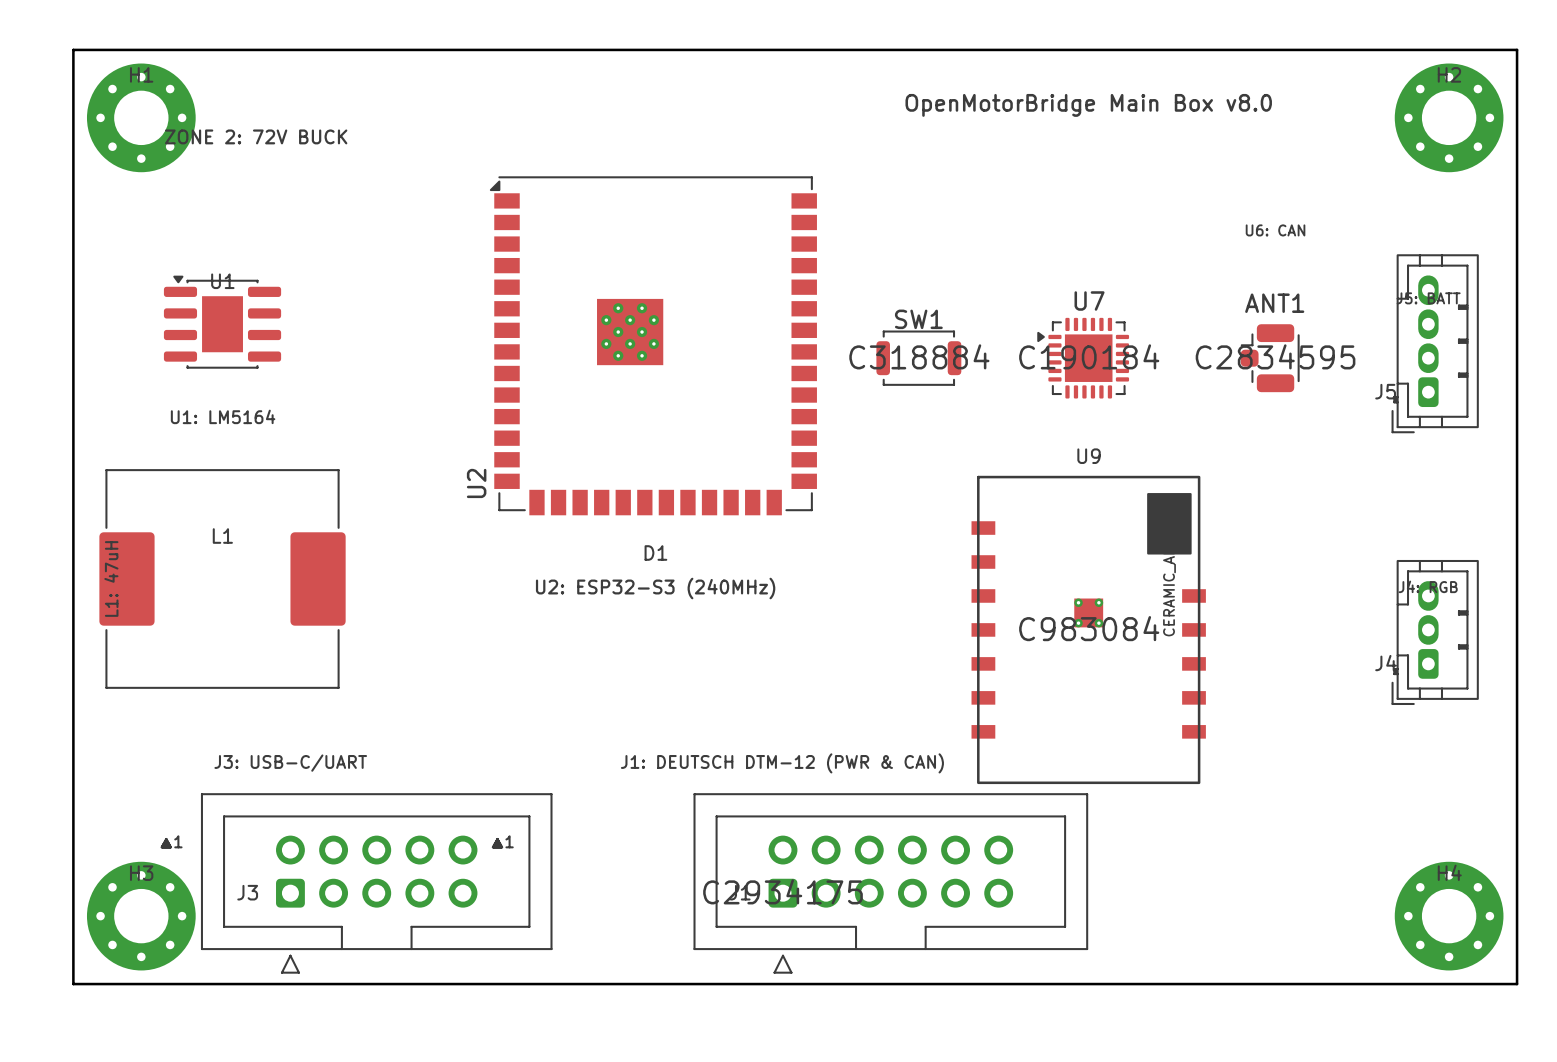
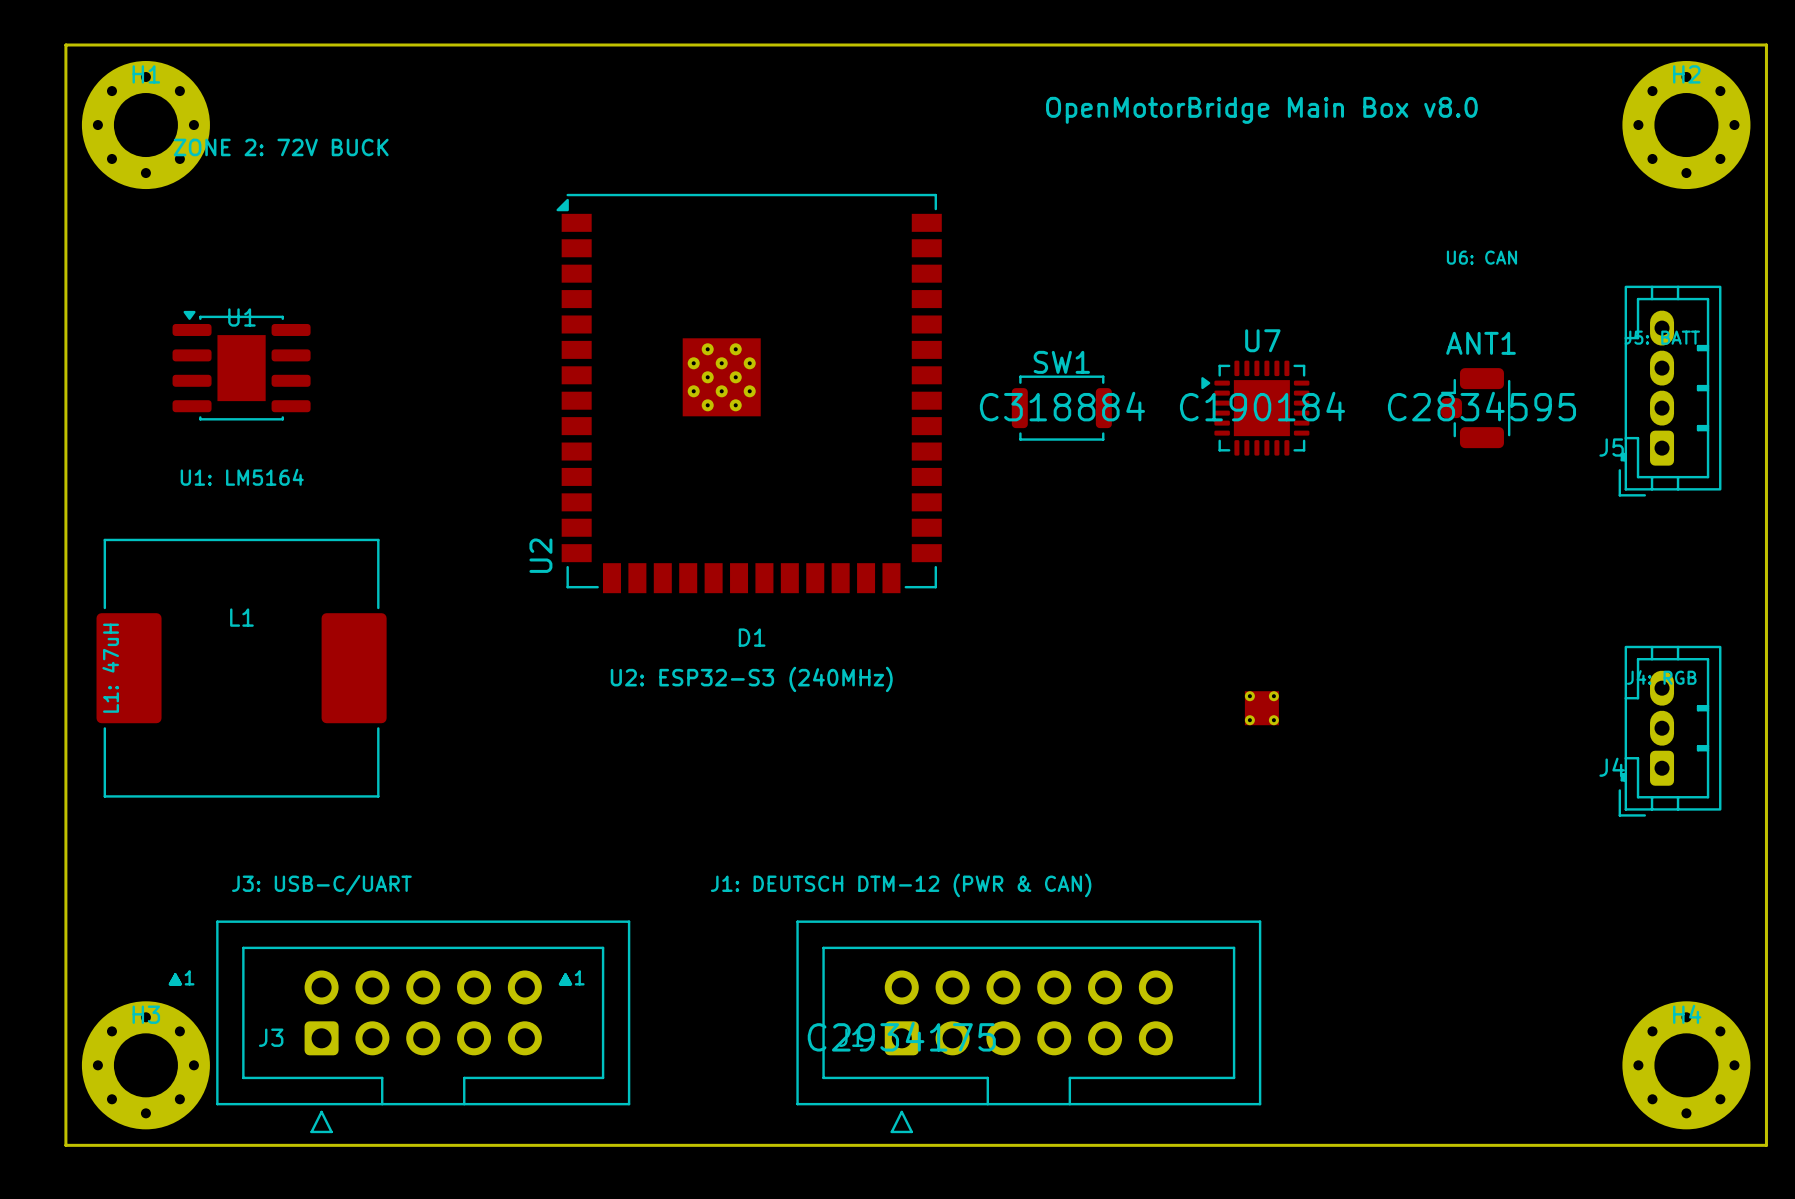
U9: (1088, 629) -> none

